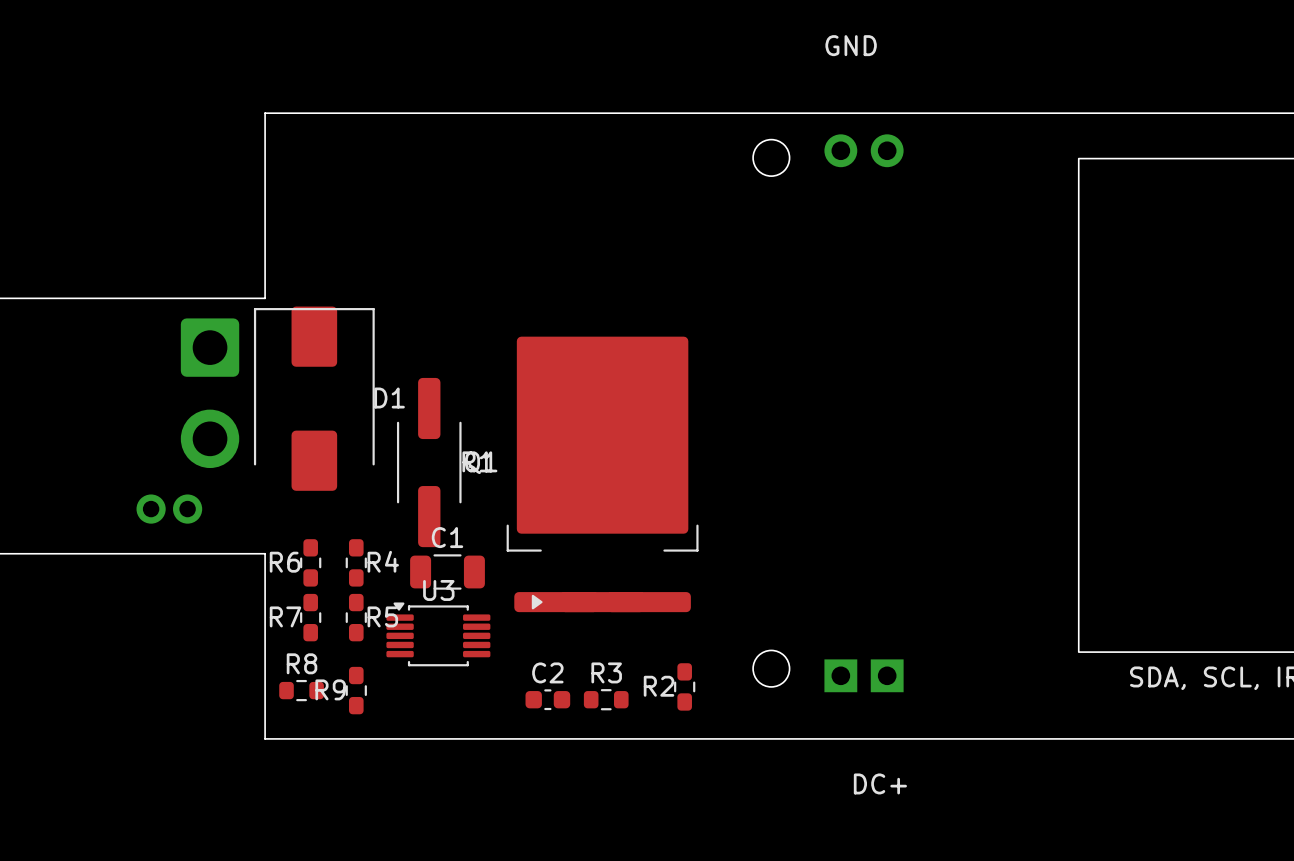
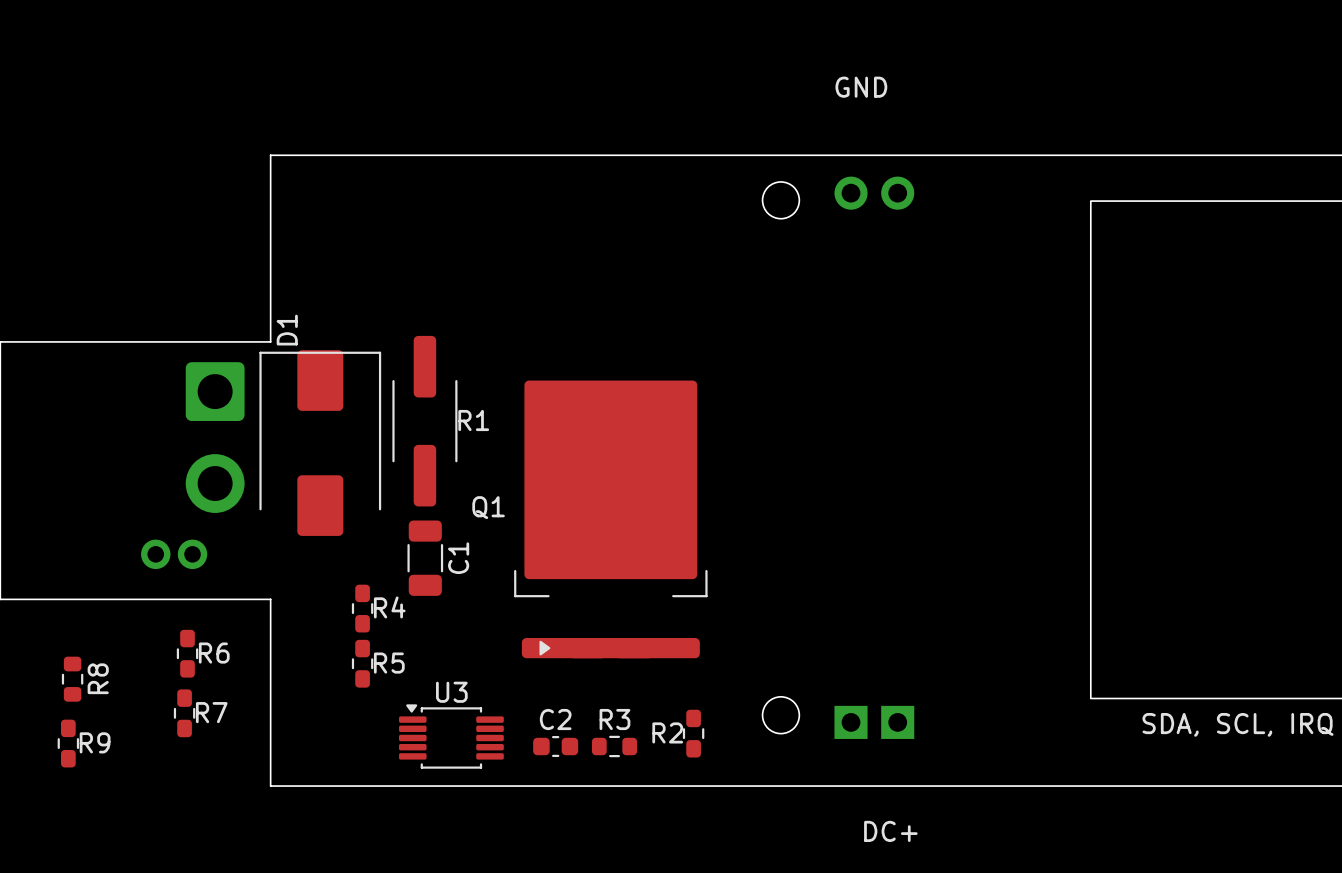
D1 name rotation: 0° (389, 398) -> 90° counterclockwise (287, 330)
D1 name position: D1 (389, 398) -> D1 (287, 330)
R1 position: (429, 462) -> (424, 421)
R6 name position: R6 (285, 562) -> R6 (214, 653)
R6 position: (310, 562) -> (187, 653)
C1 rotation: 0° (447, 572) -> 90° clockwise (425, 558)
C1 position: (447, 572) -> (425, 558)
R7 name position: R7 (285, 616) -> R7 (211, 712)
R7 position: (310, 617) -> (184, 713)
U3 position: (438, 634) -> (451, 736)
R9 name position: R9 (330, 689) -> R9 (95, 742)
R8 rotation: 0° (301, 690) -> 90° clockwise (72, 679)
R8 position: (301, 690) -> (72, 679)
R9 position: (356, 690) -> (68, 743)

